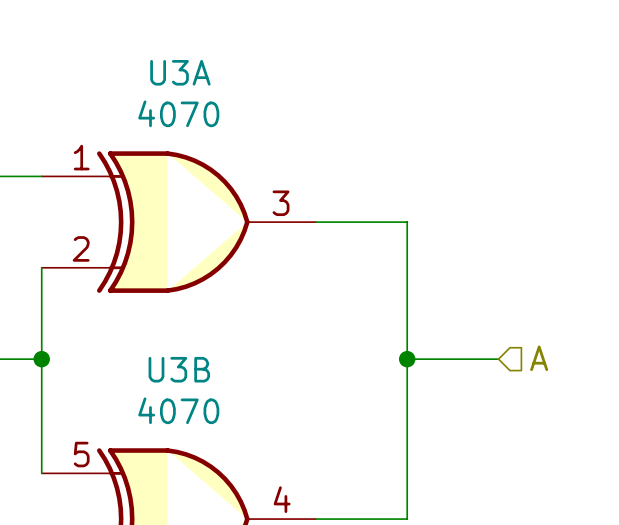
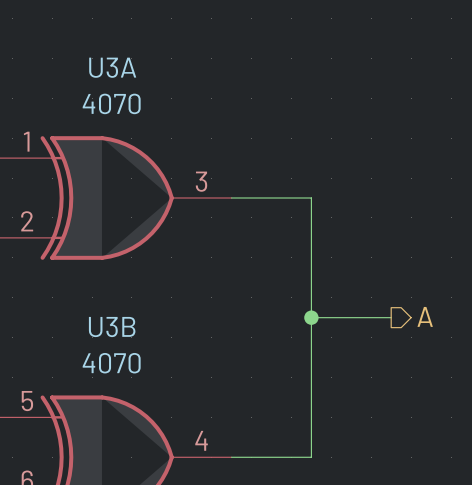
hierarchical label shape: input (539, 358) -> output (425, 316)

